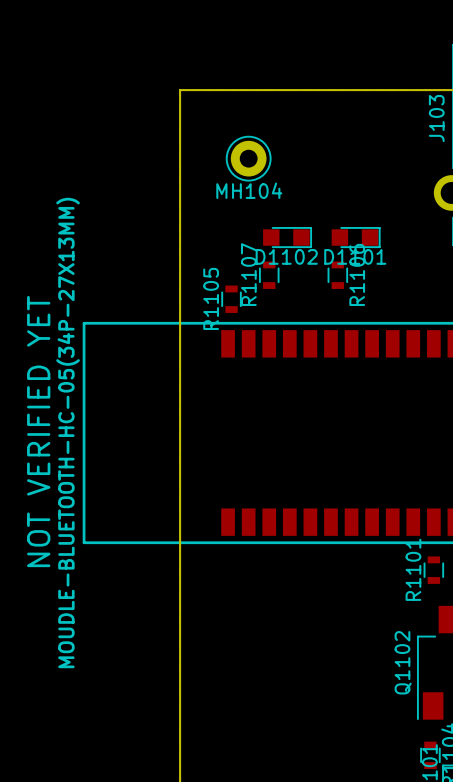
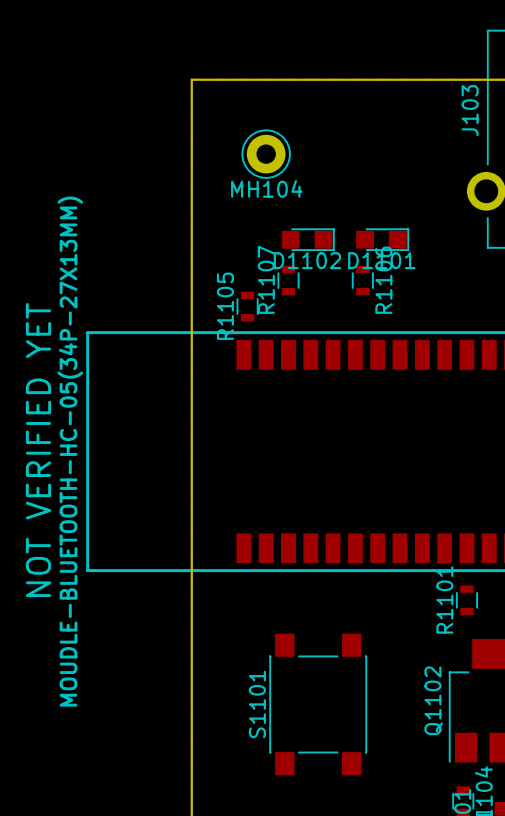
S1101: none -> (318, 704)

